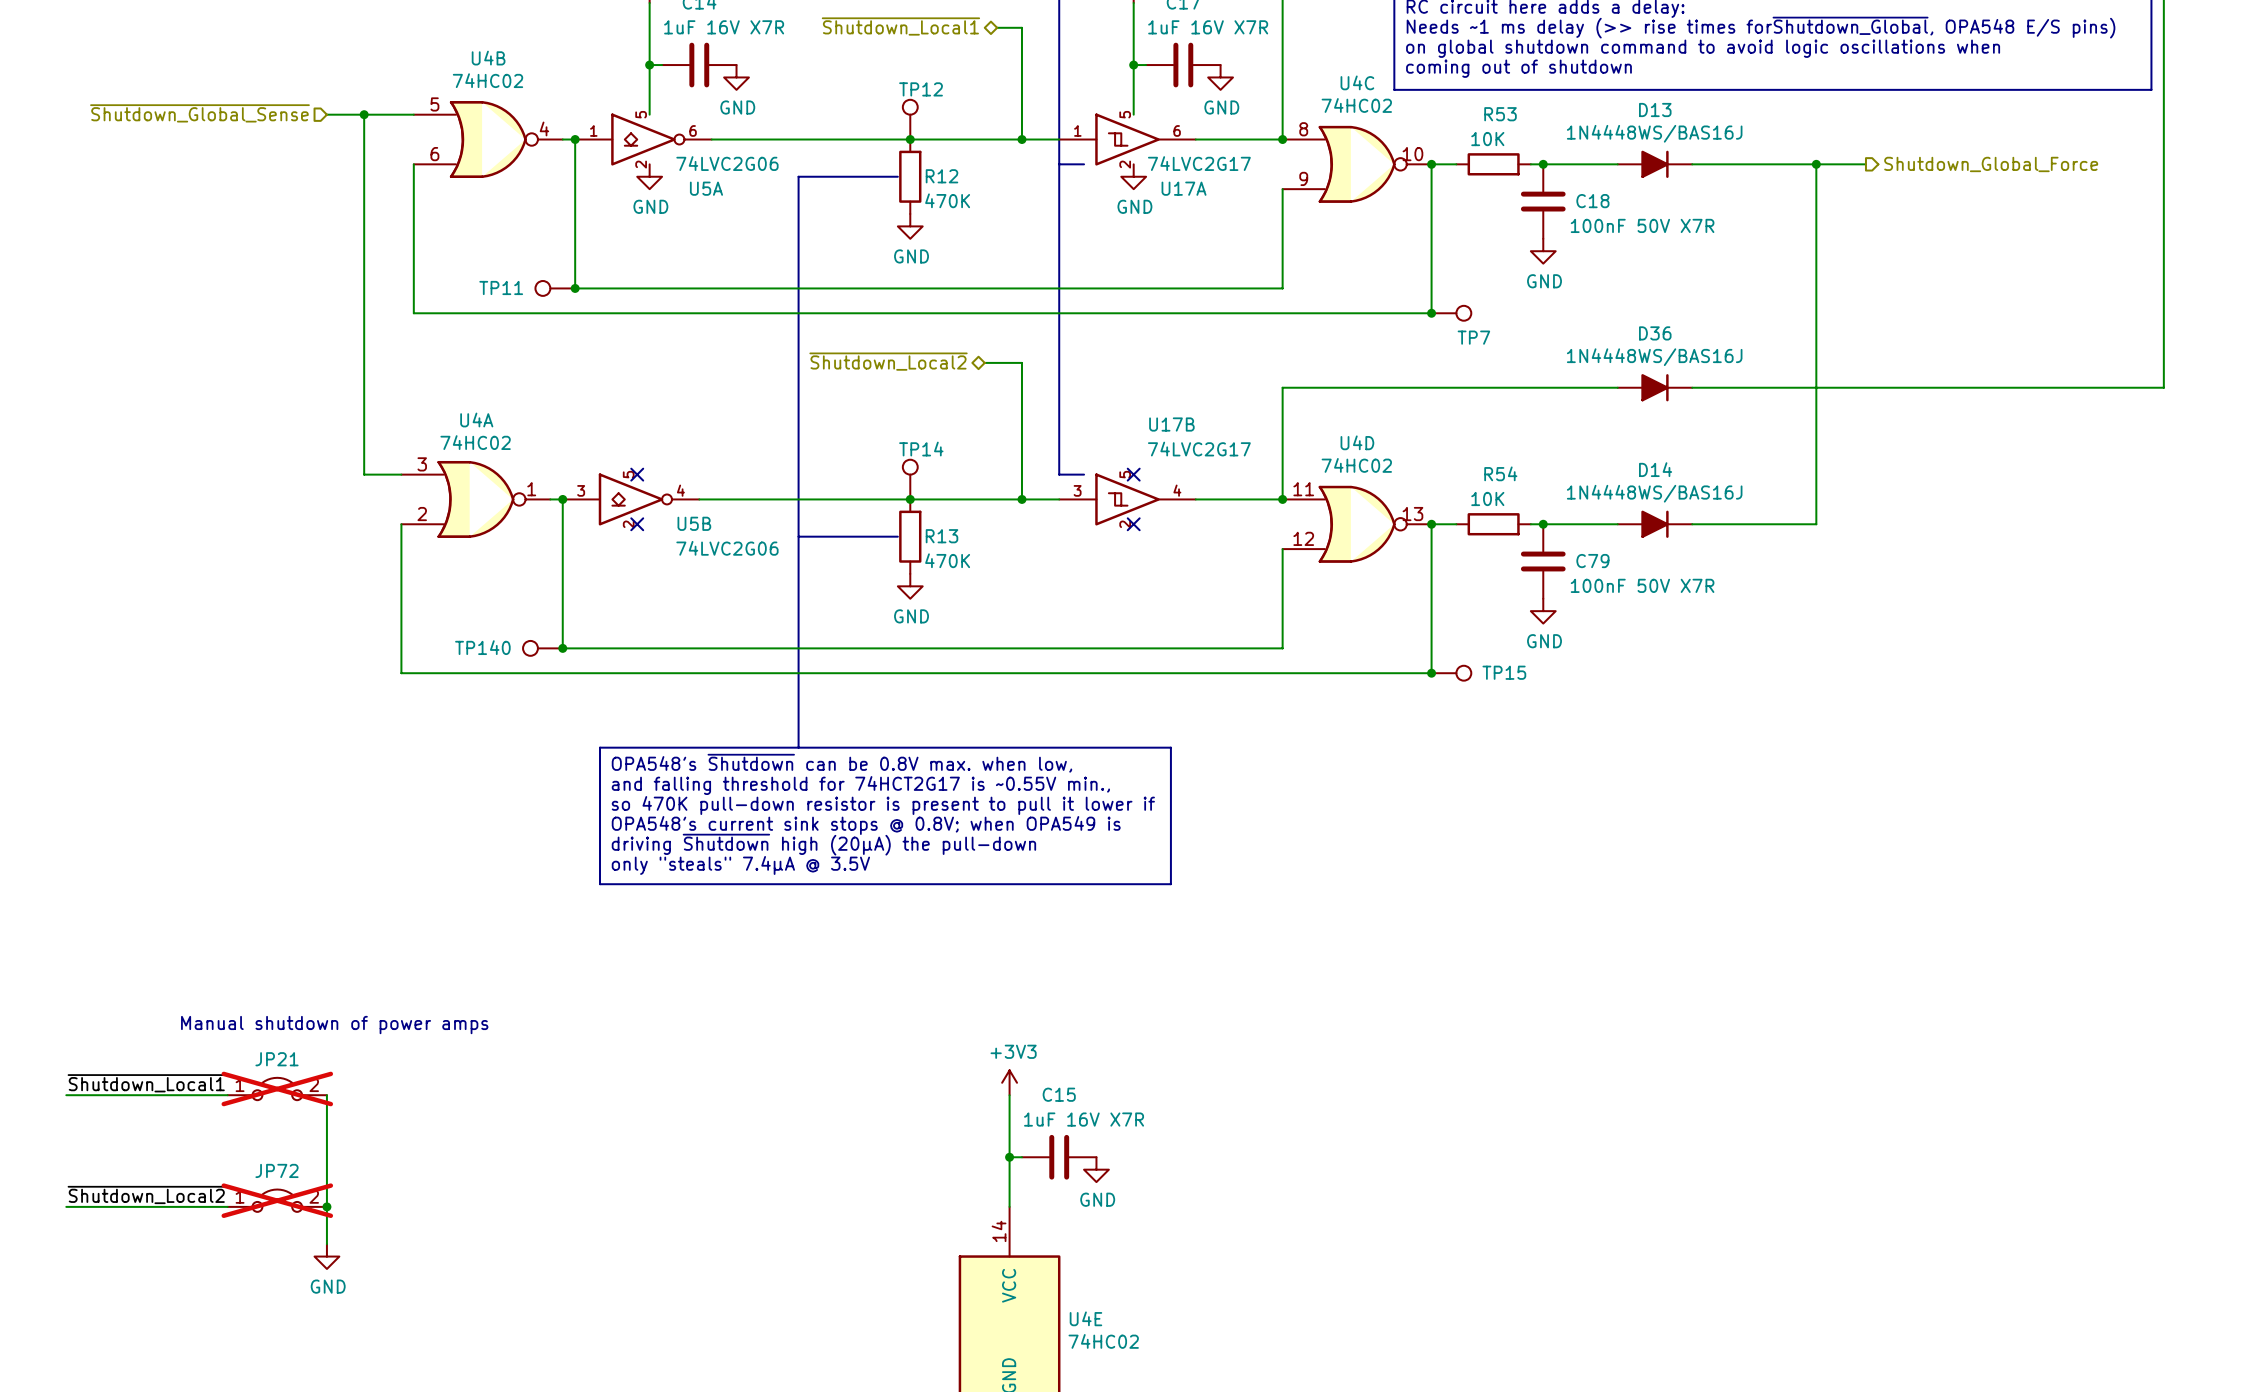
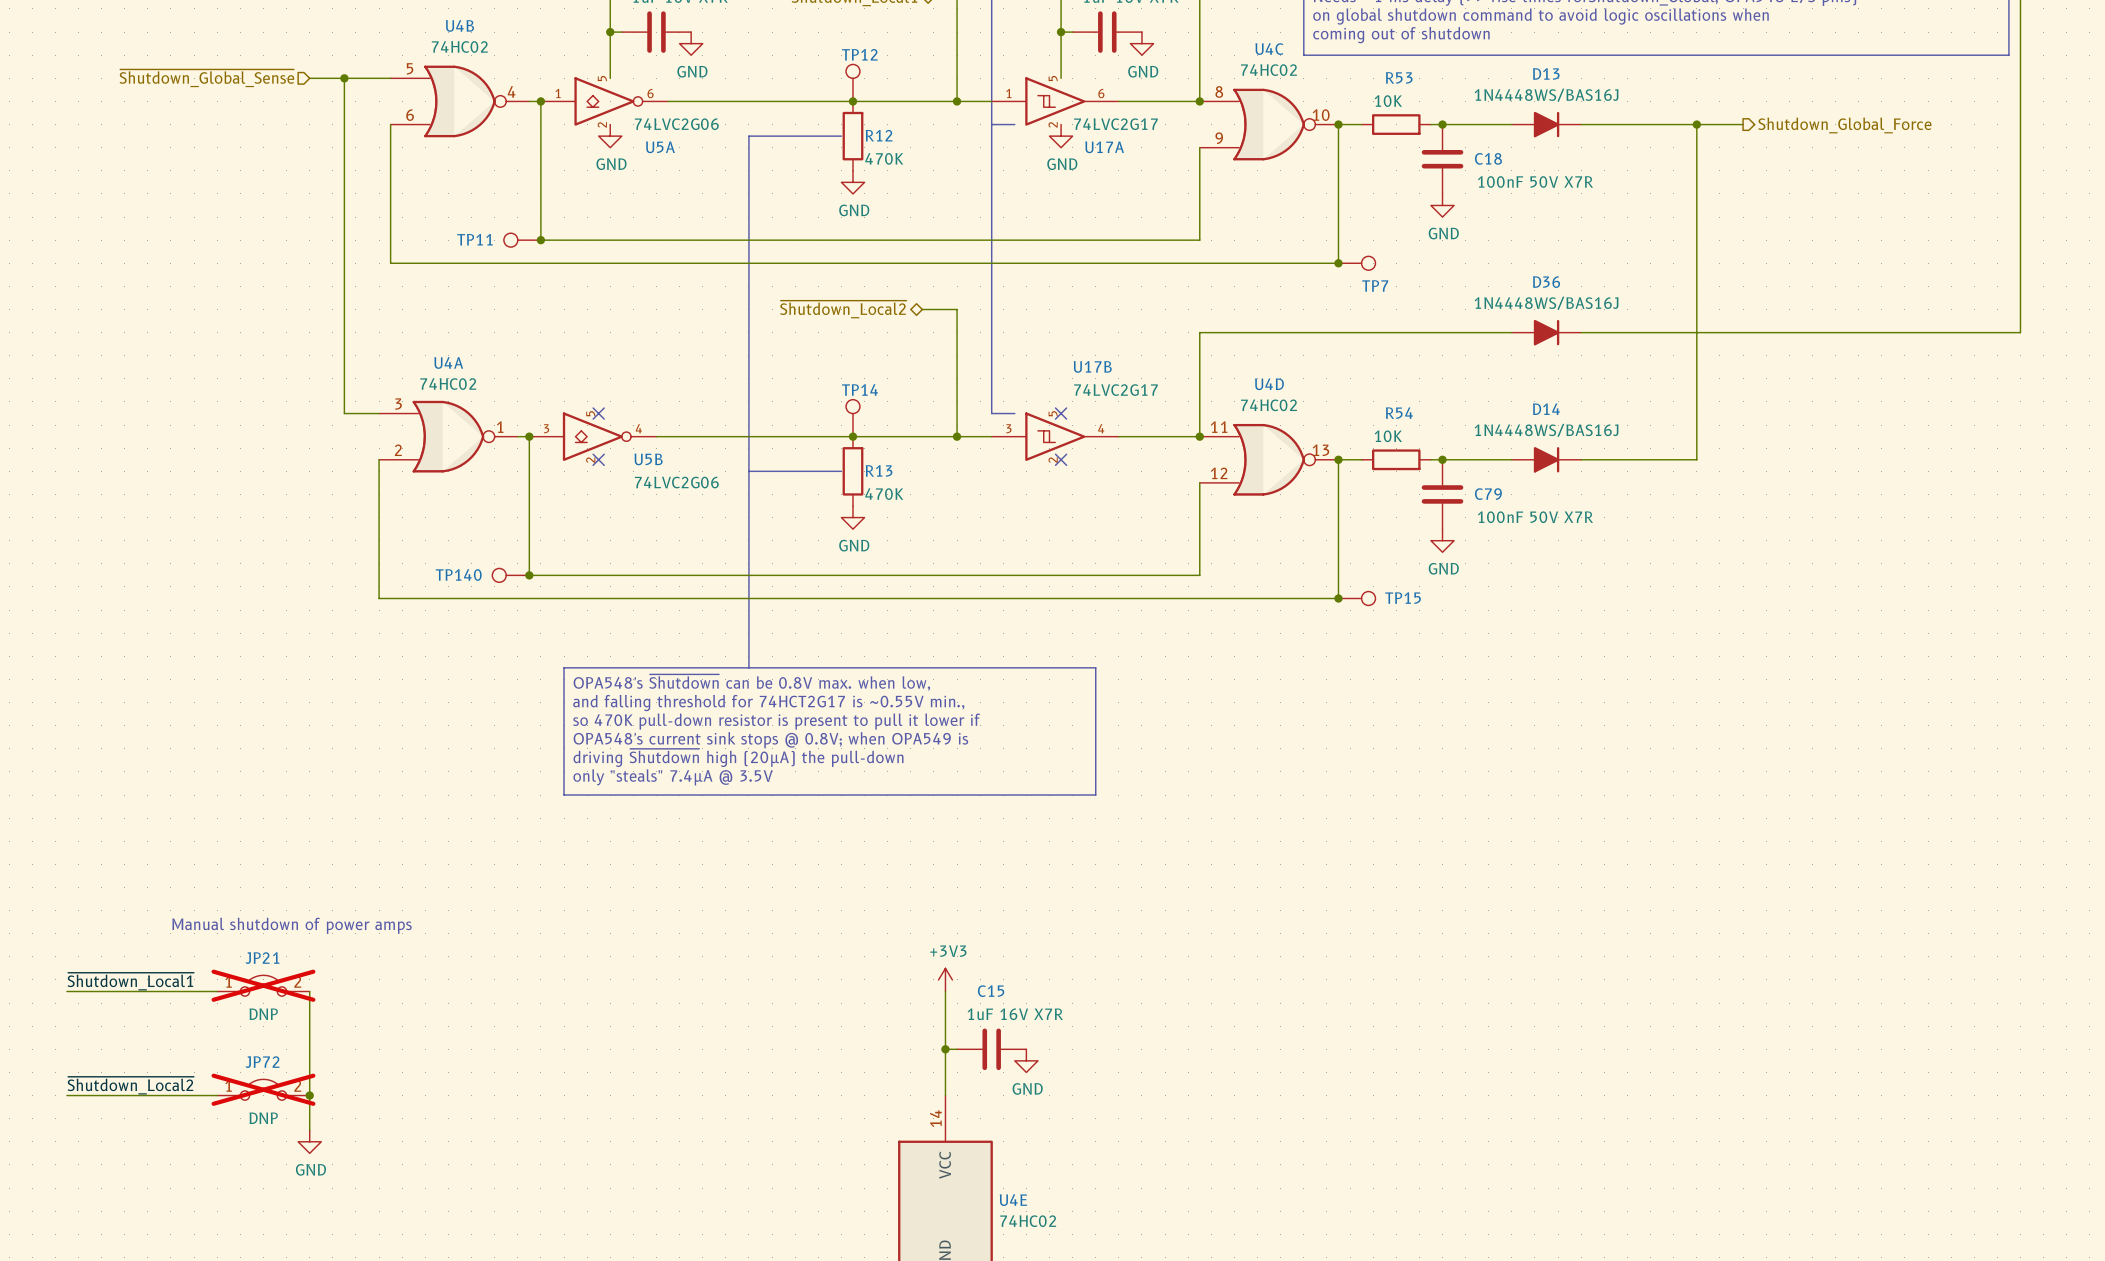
JP21 text: none -> DNP (263, 1014)
JP72 text: none -> DNP (263, 1118)

